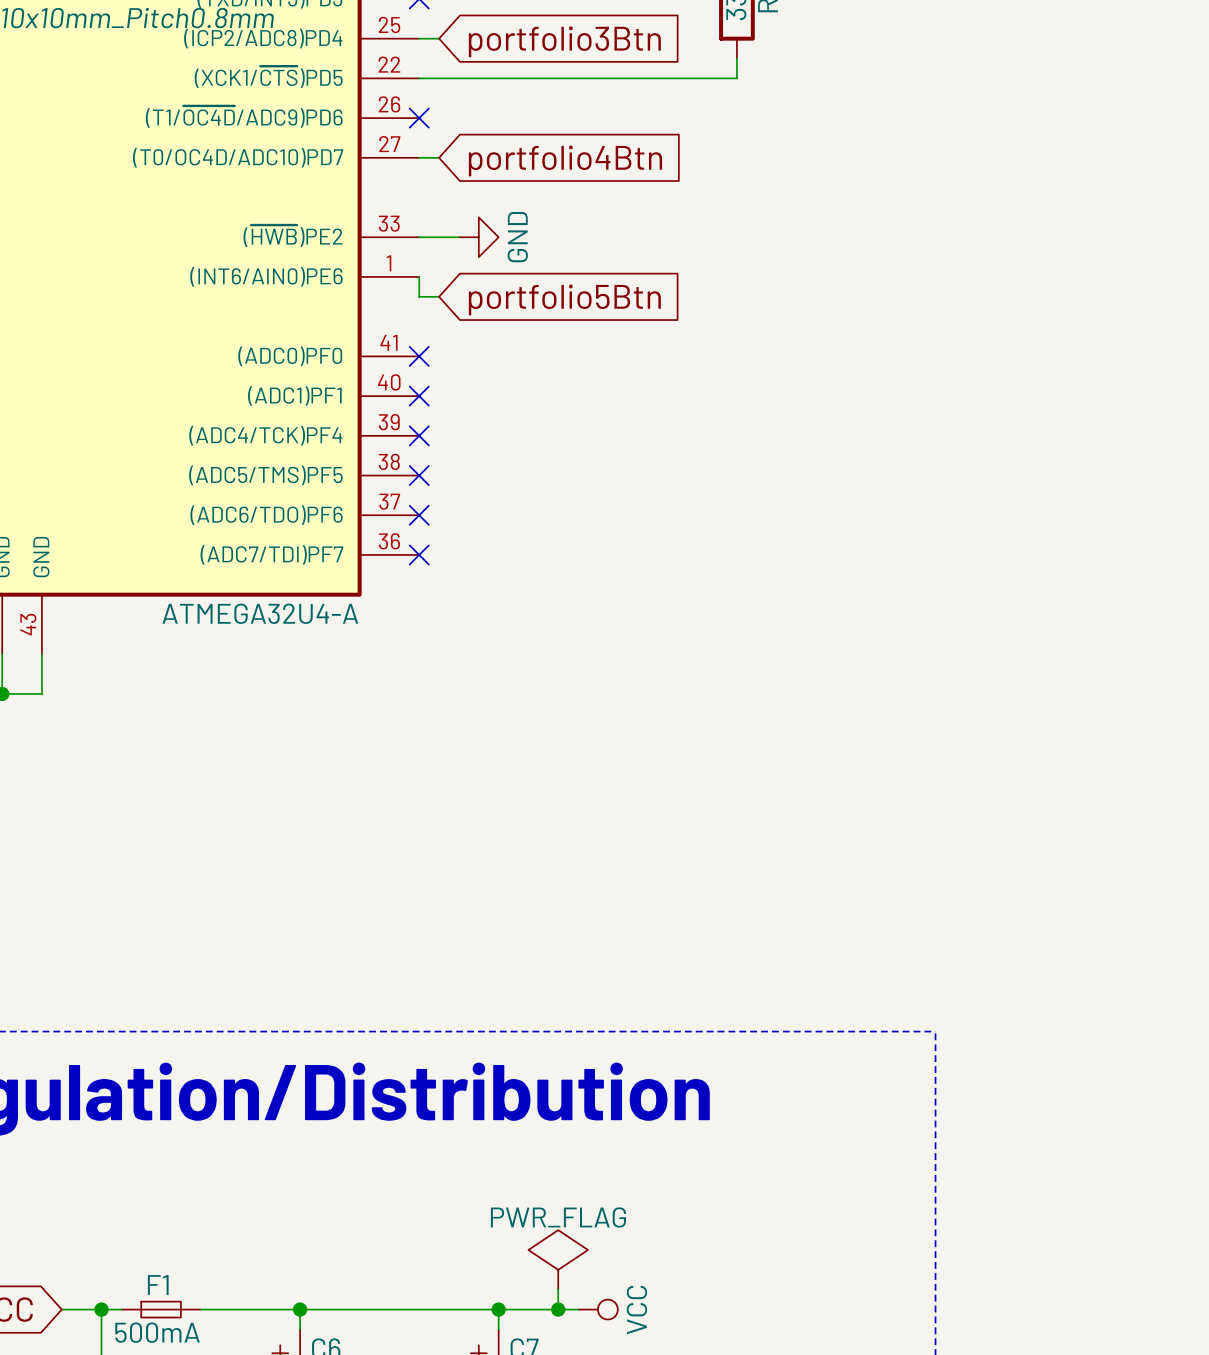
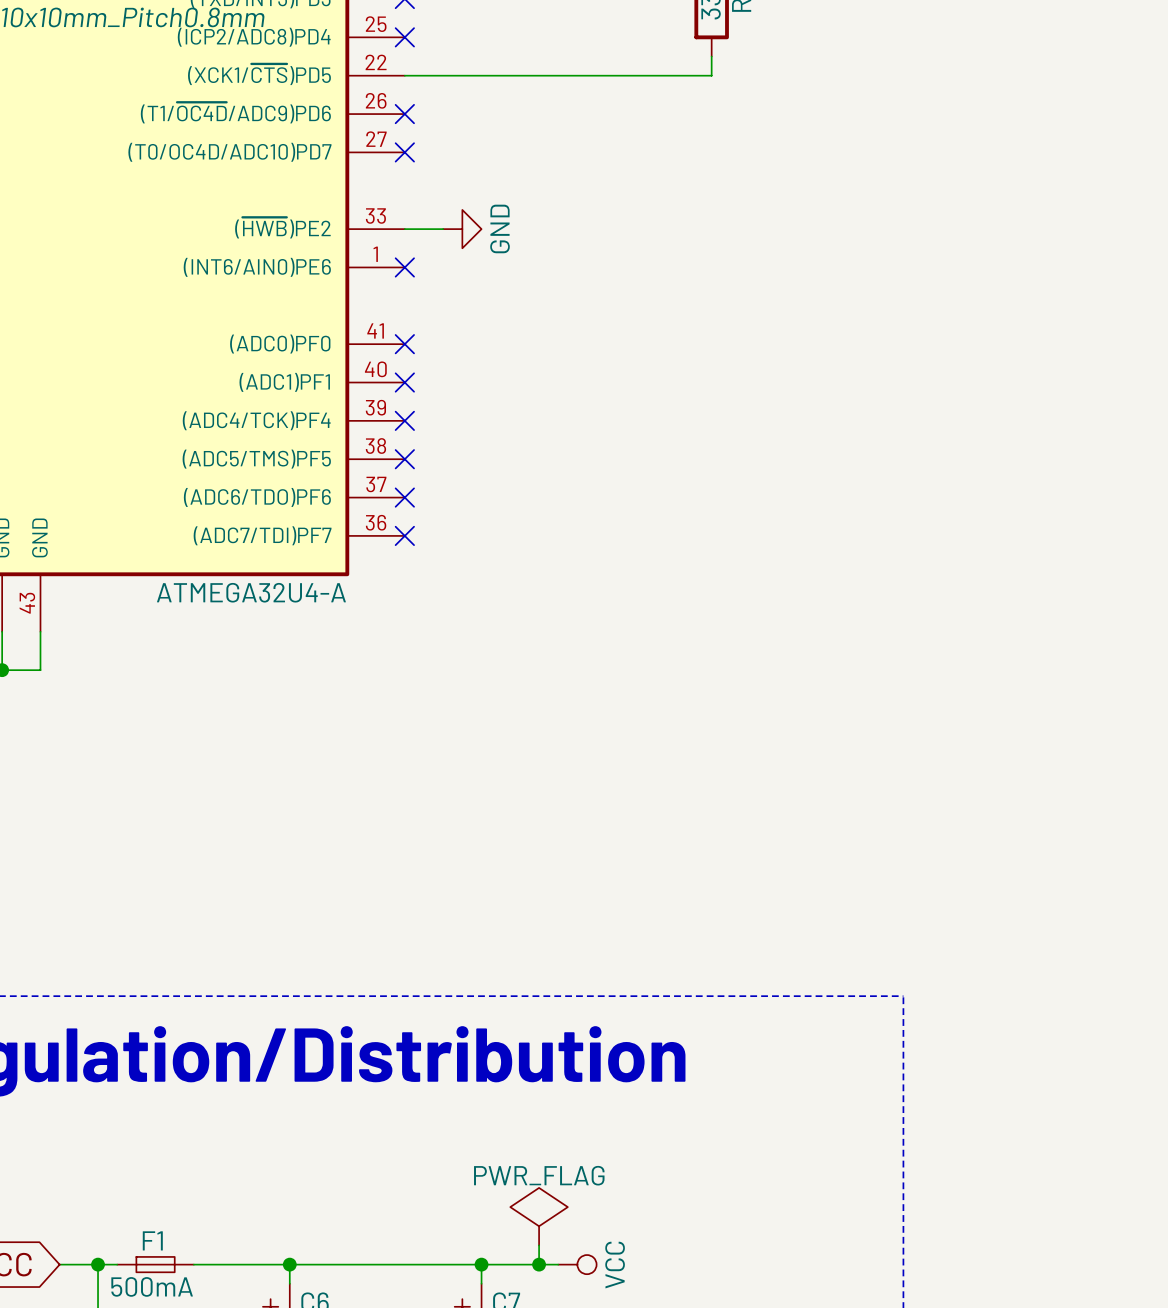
wire: (419, 38) (439, 38) -> none
no-connect mark: none -> (404, 37)
global label: portfolio3Btn (564, 41) -> none
wire: (419, 157) (439, 157) -> none
no-connect mark: none -> (404, 152)
global label: portfolio4Btn (565, 160) -> none
wire: (419, 276) (419, 296) (439, 296) -> none
no-connect mark: none -> (404, 267)
global label: portfolio5Btn (564, 299) -> none

